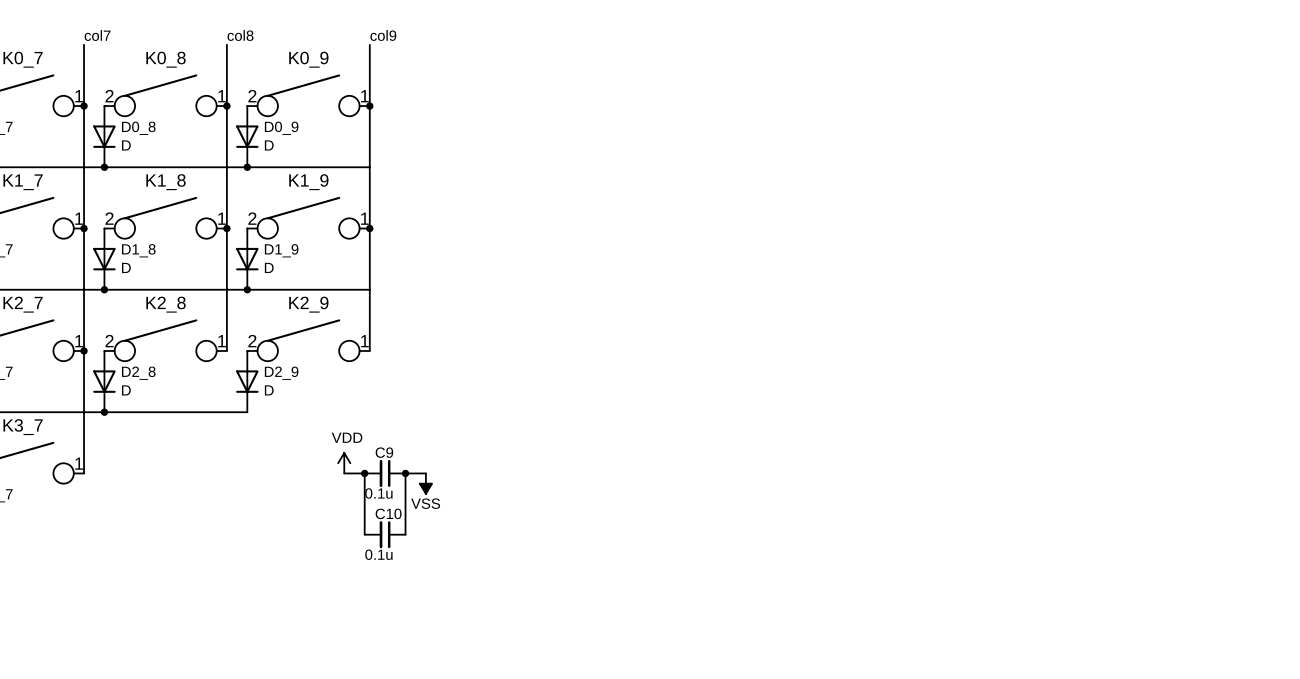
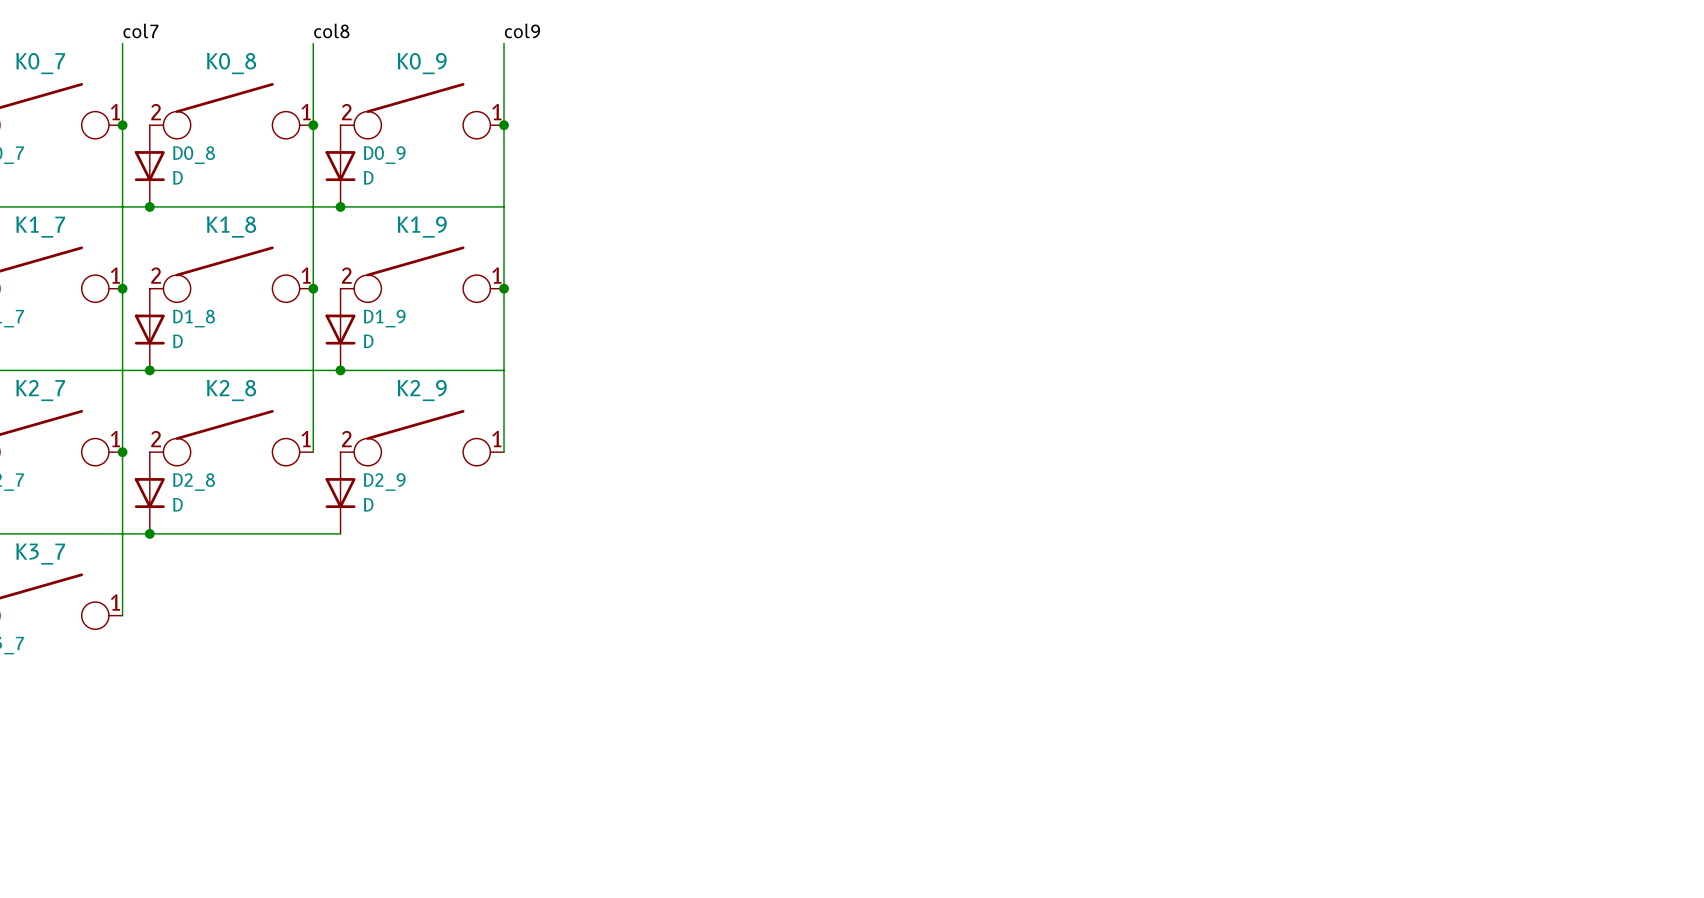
power symbol: VDD (344, 463) -> none
wire: (344, 473) (364, 473) (364, 534) -> none
junction: (364, 473) -> none
C9: 0.1u (385, 473) -> none
junction: (405, 473) -> none
wire: (425, 473) (405, 473) (405, 534) -> none
power symbol: VSS (425, 483) -> none
C10: 0.1u (385, 534) -> none

